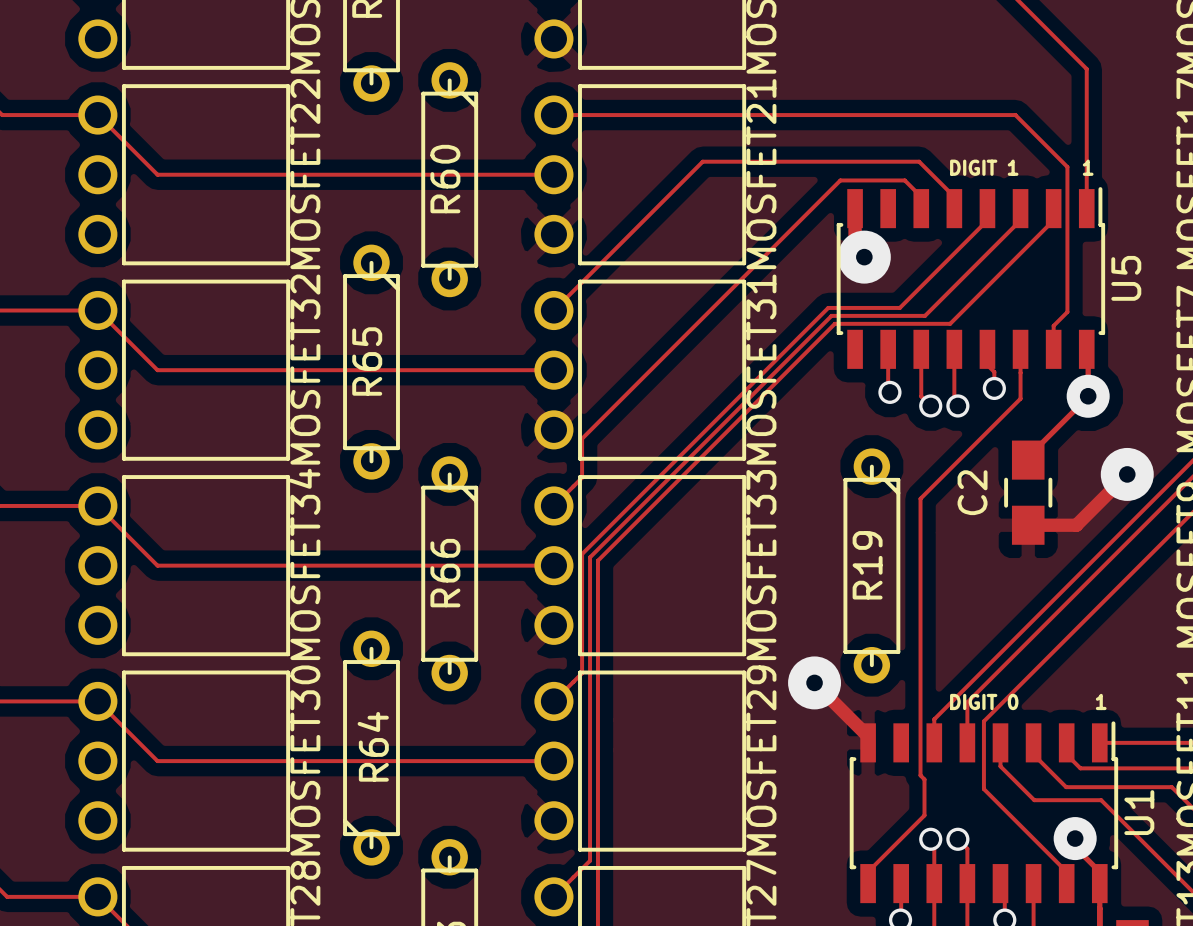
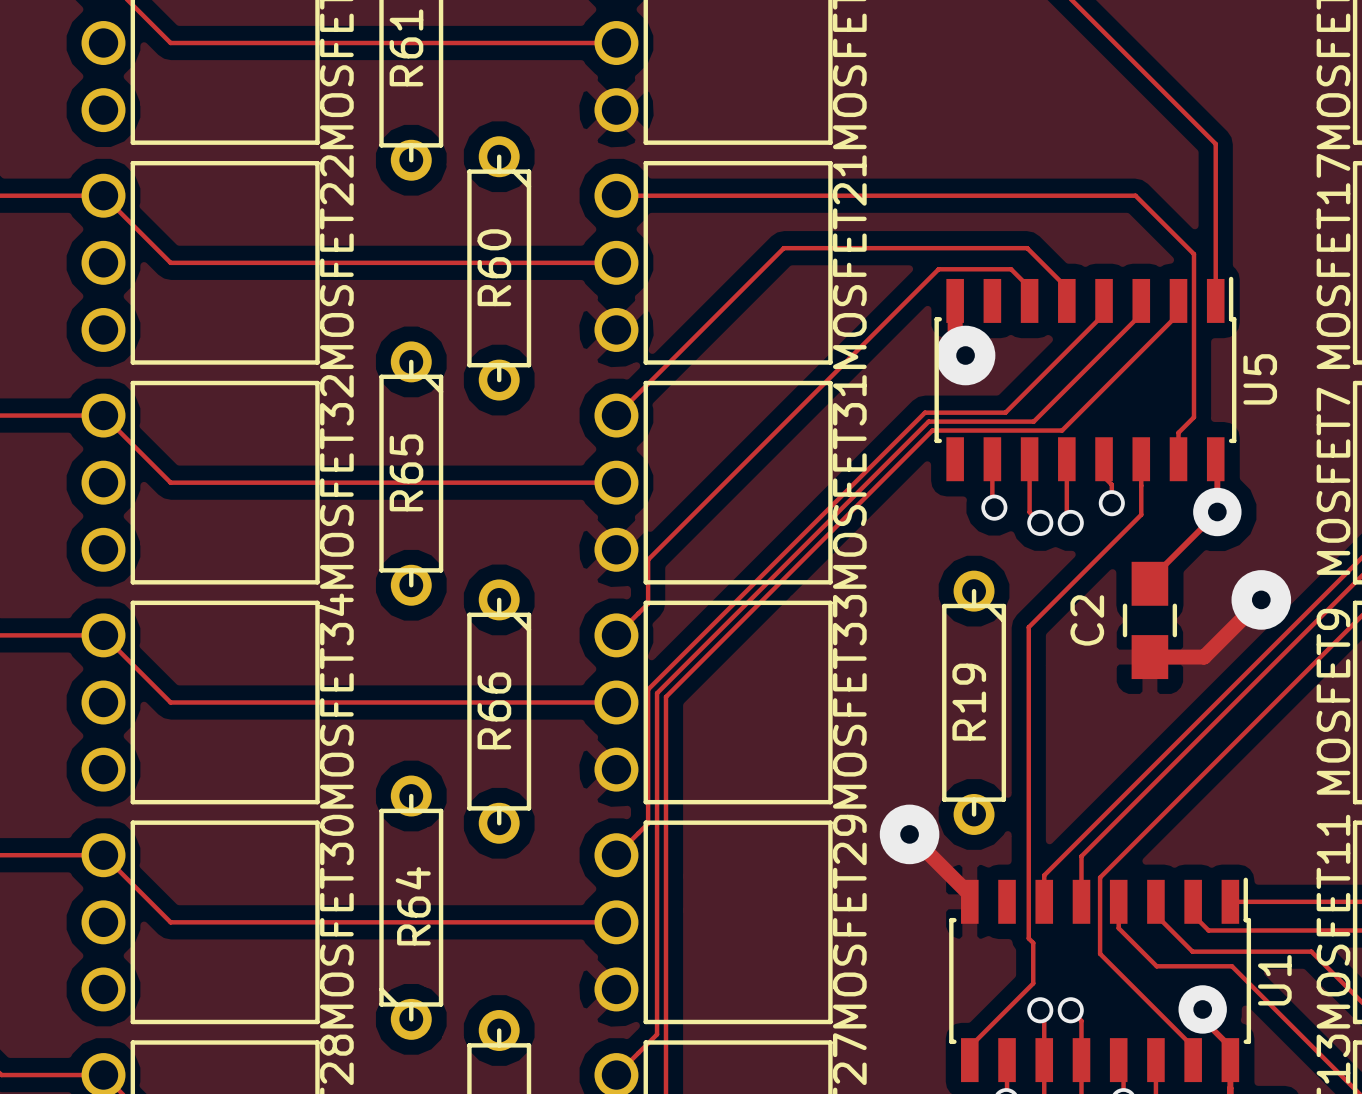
text: DIGIT 1 (984, 167) -> none
text: 1 (1088, 167) -> none
text: DIGIT 0 (984, 701) -> none
text: 1 (1101, 701) -> none

